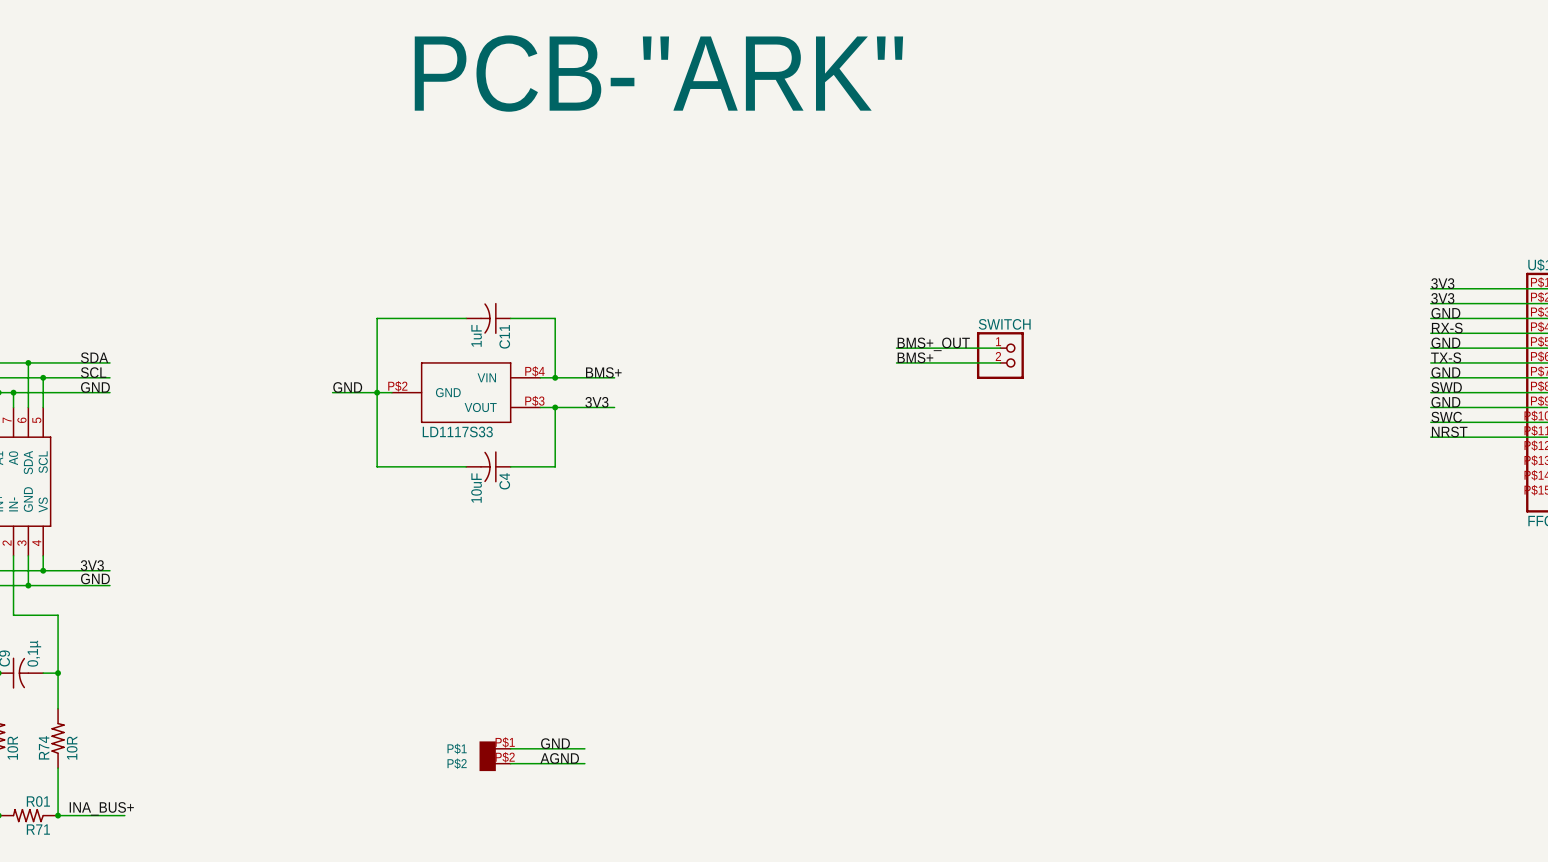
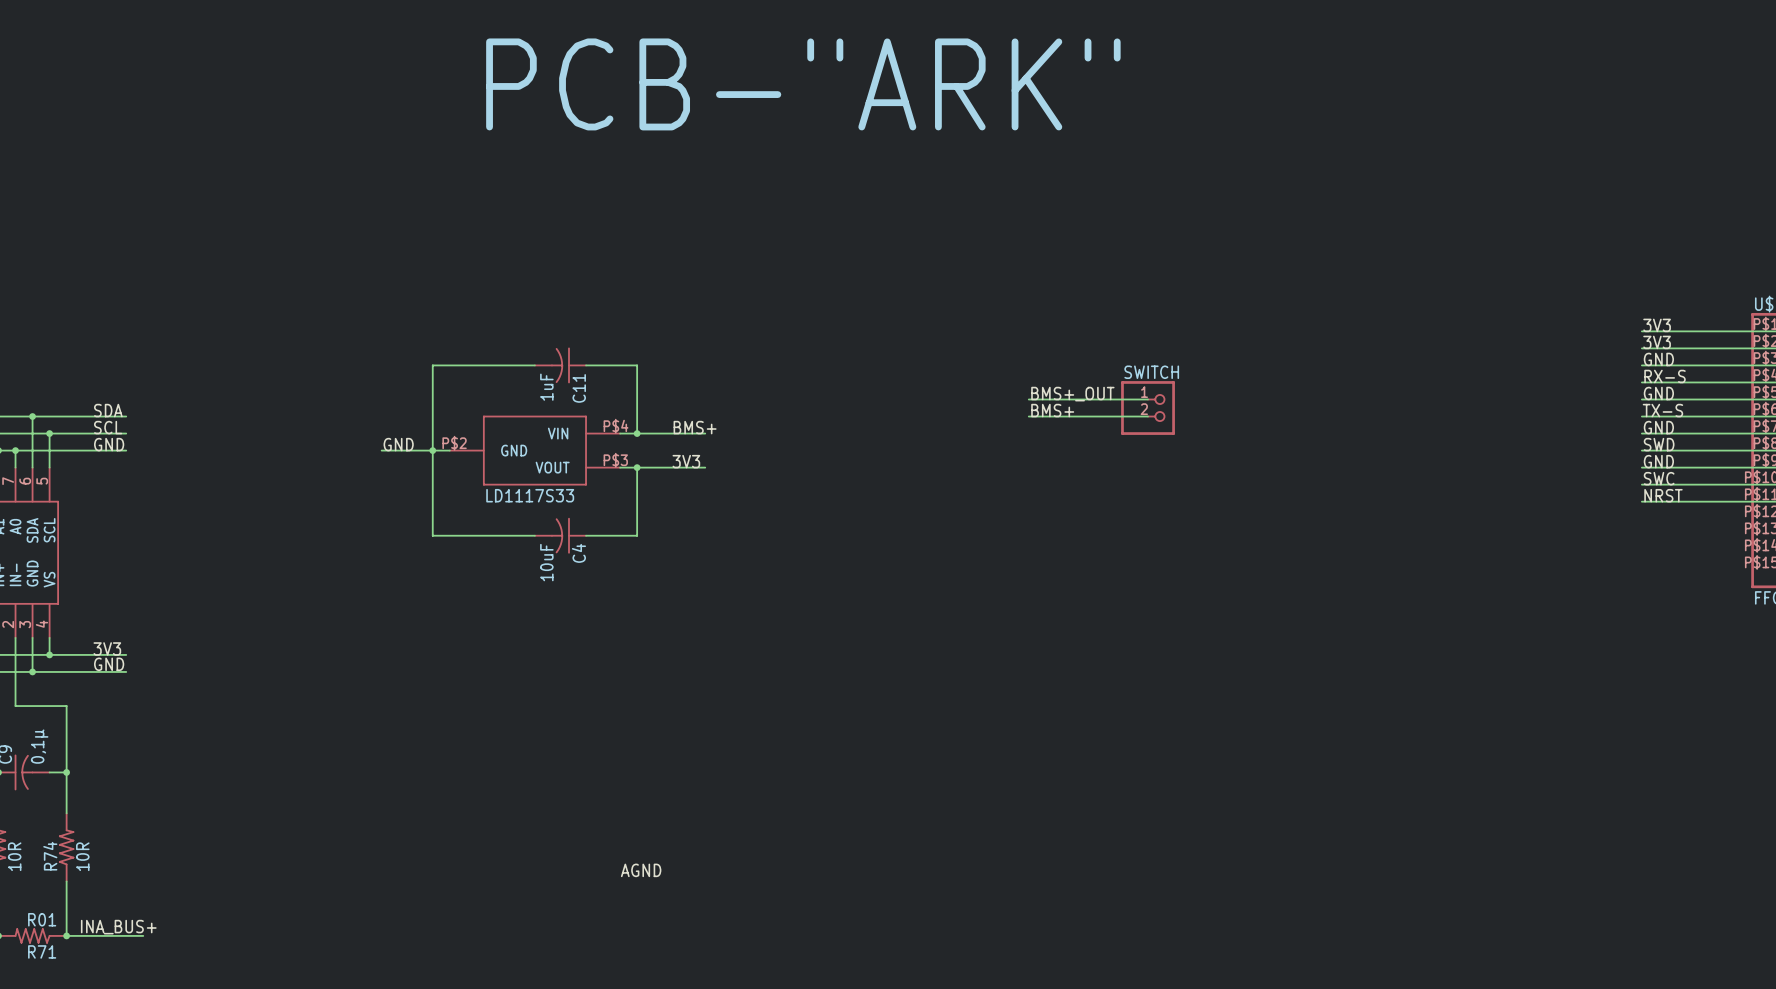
label: GND (555, 743) -> none
wire: (510, 748) (584, 748) -> none
part: (495, 756) -> none
wire: (510, 763) (584, 763) -> none

